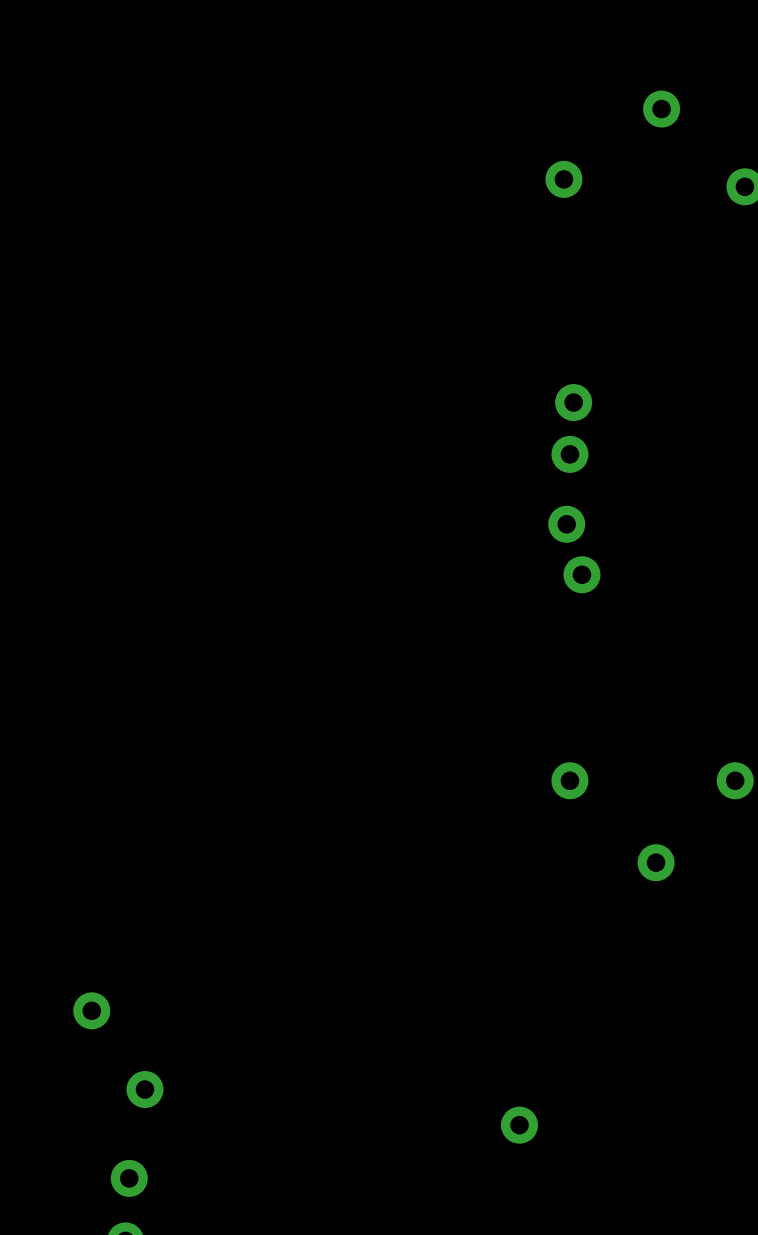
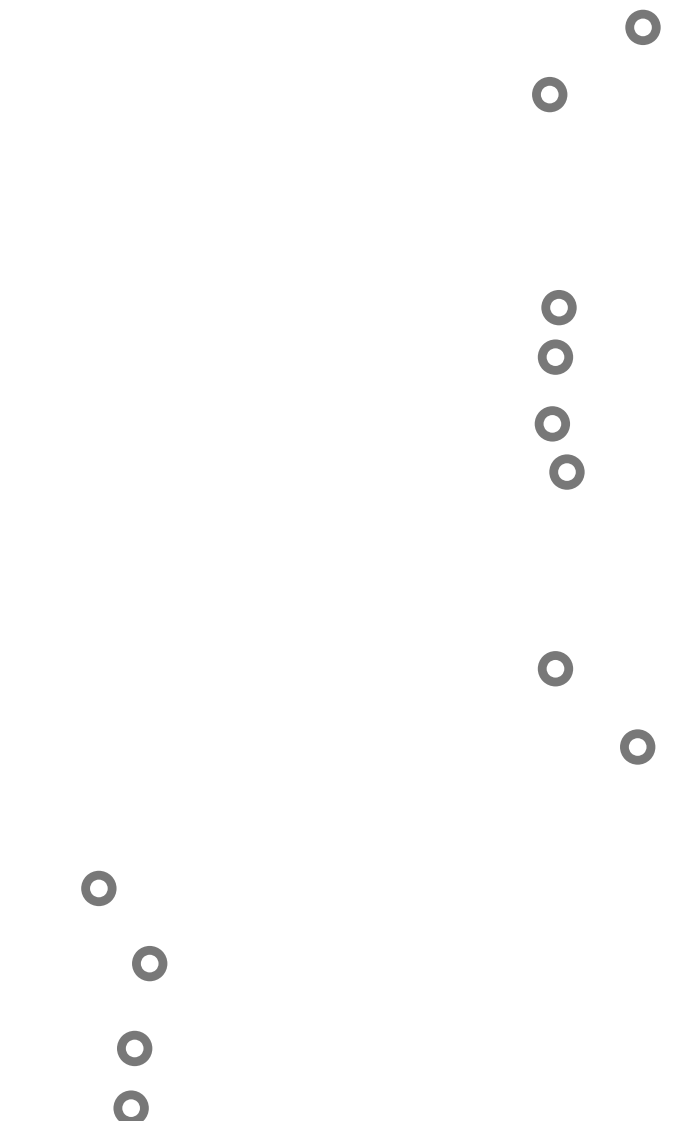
via: (519, 1125) -> none

